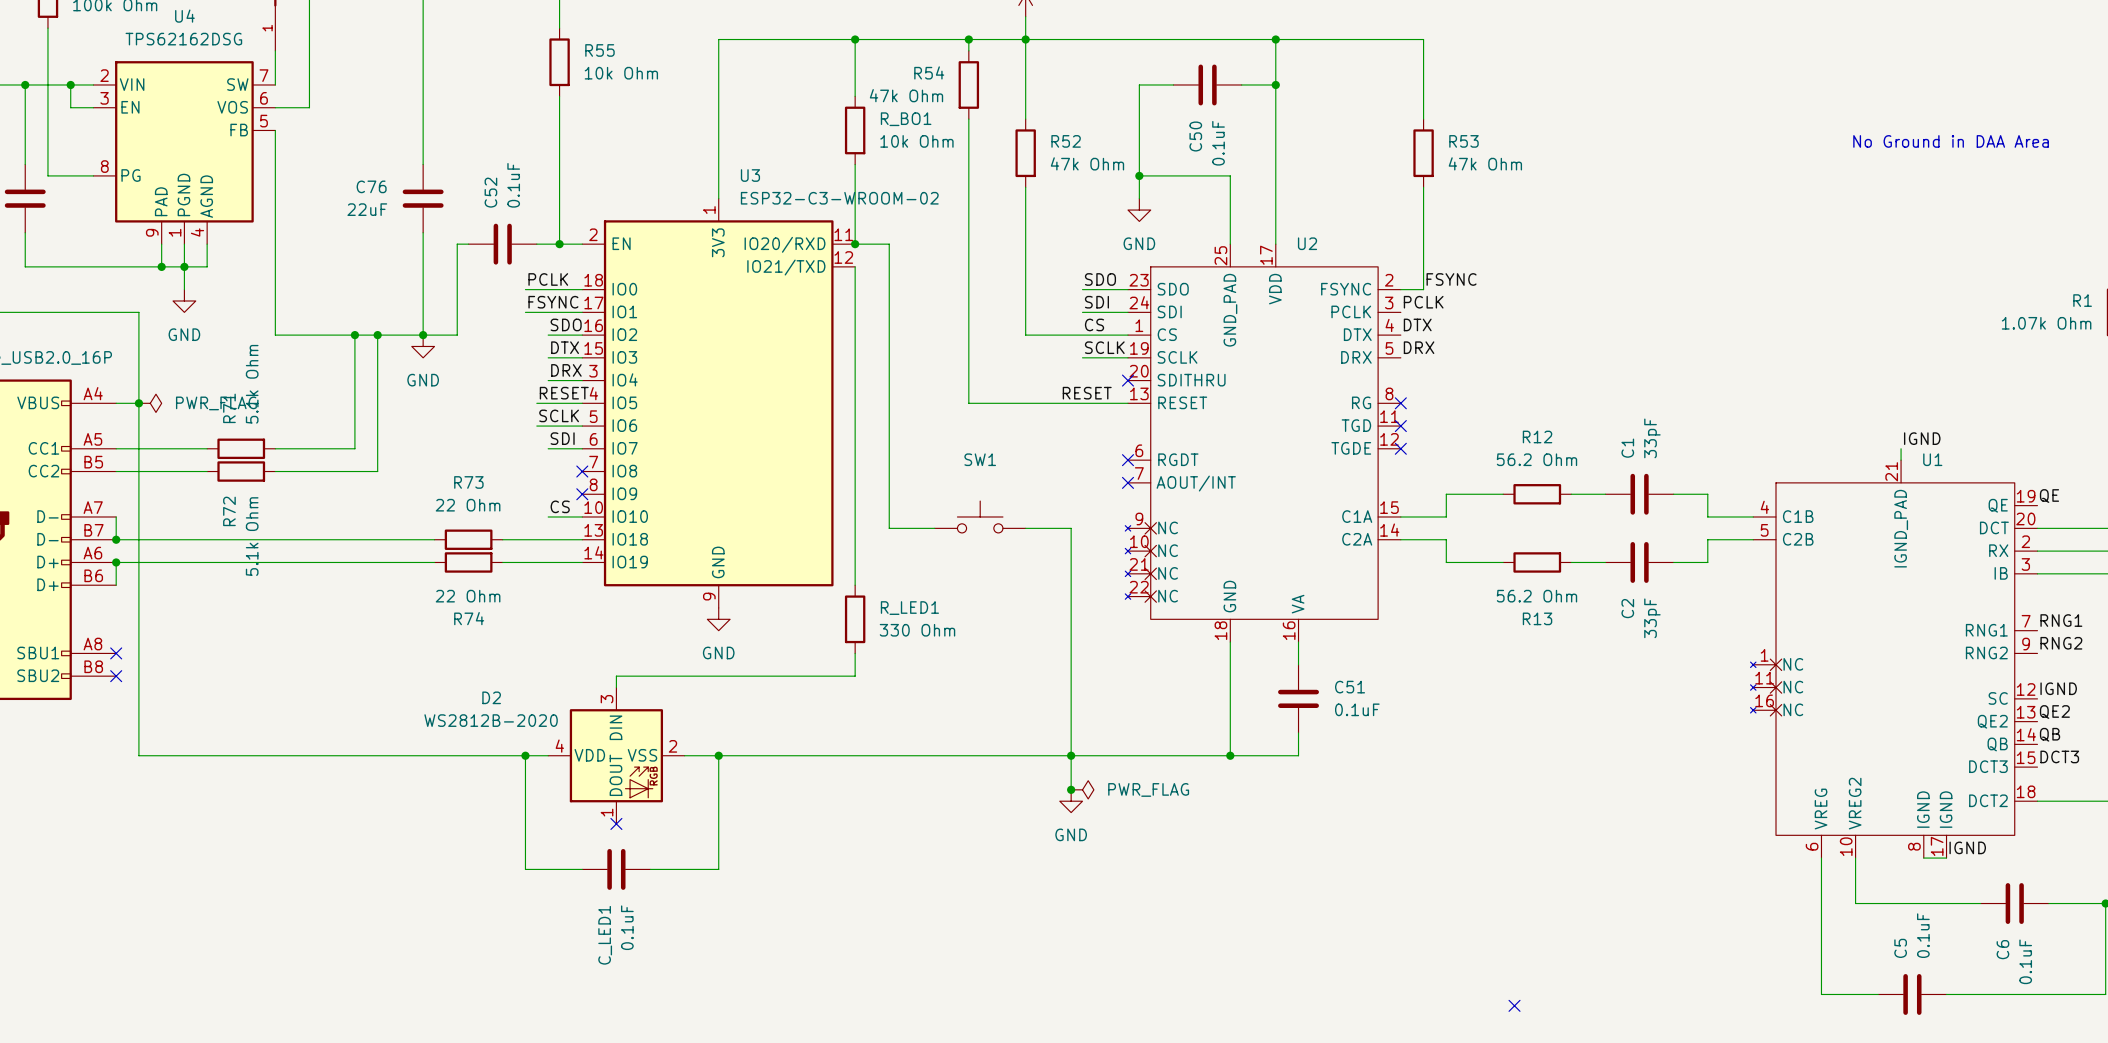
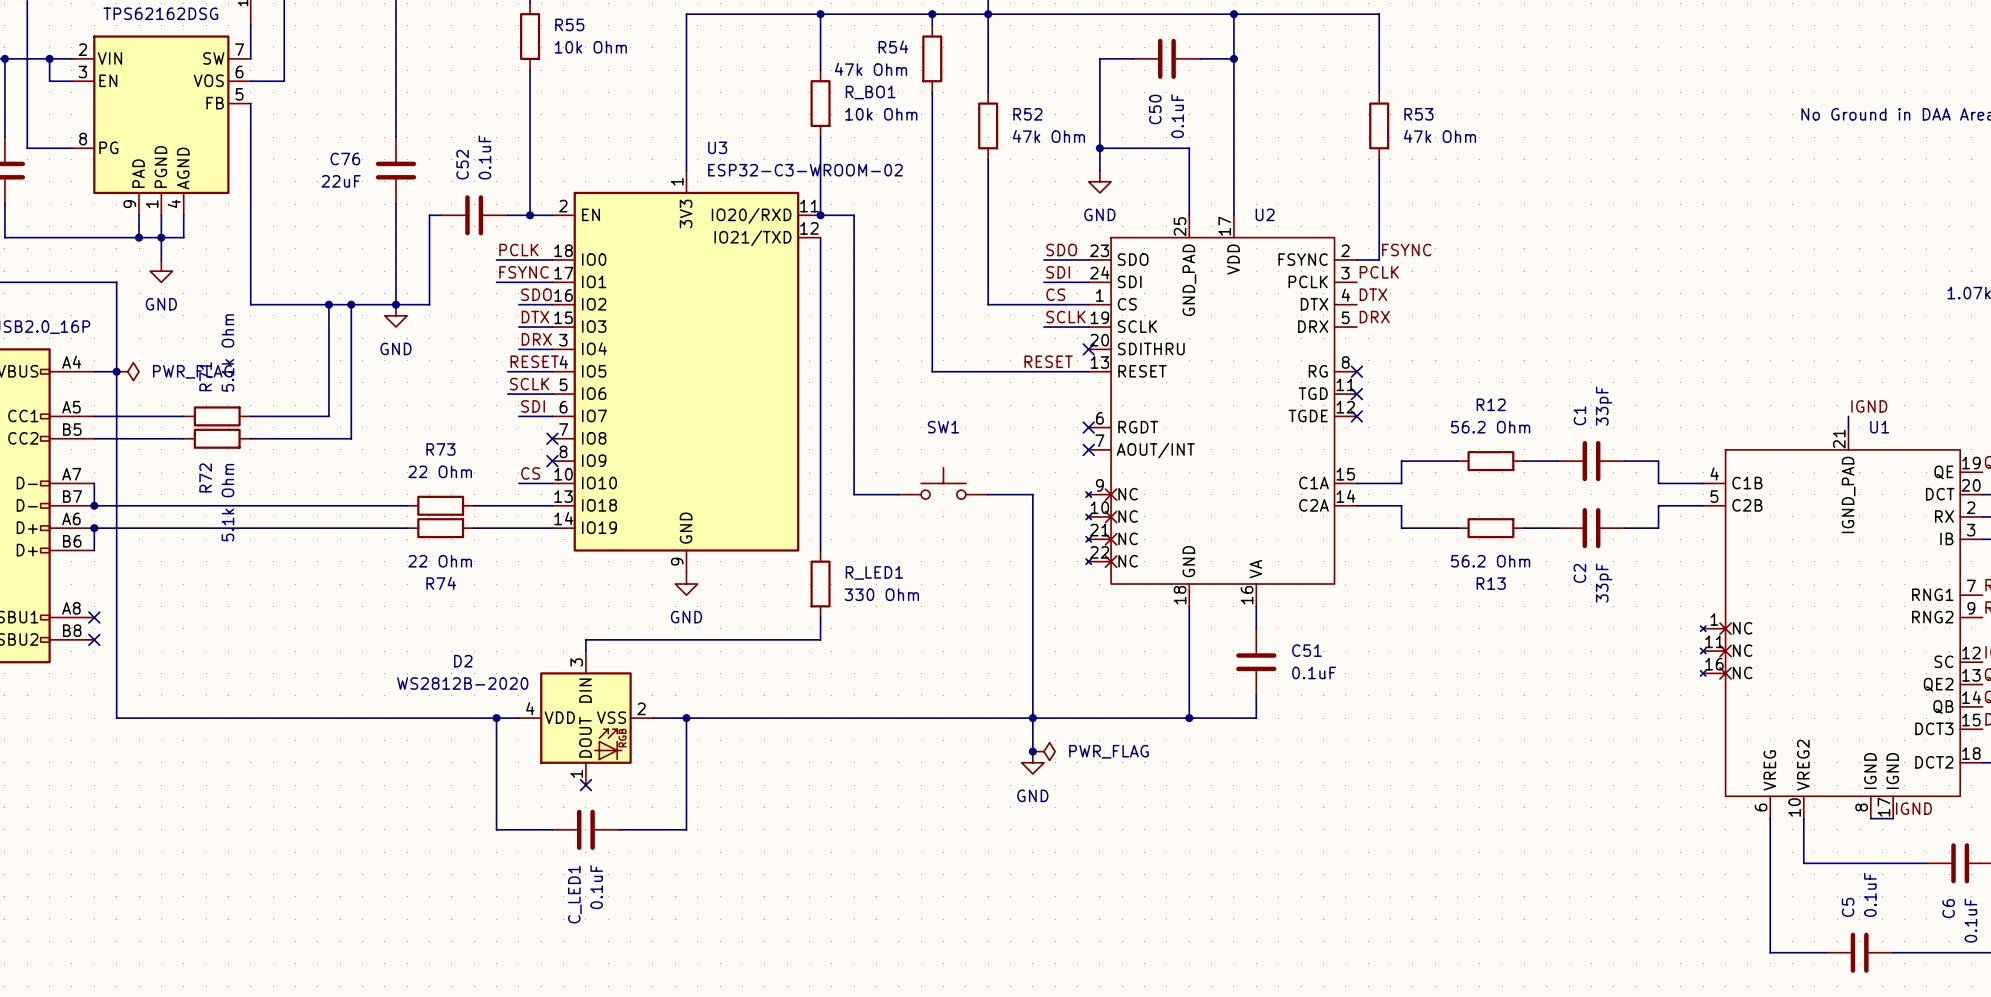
no-connect mark: (1514, 1005) -> none

